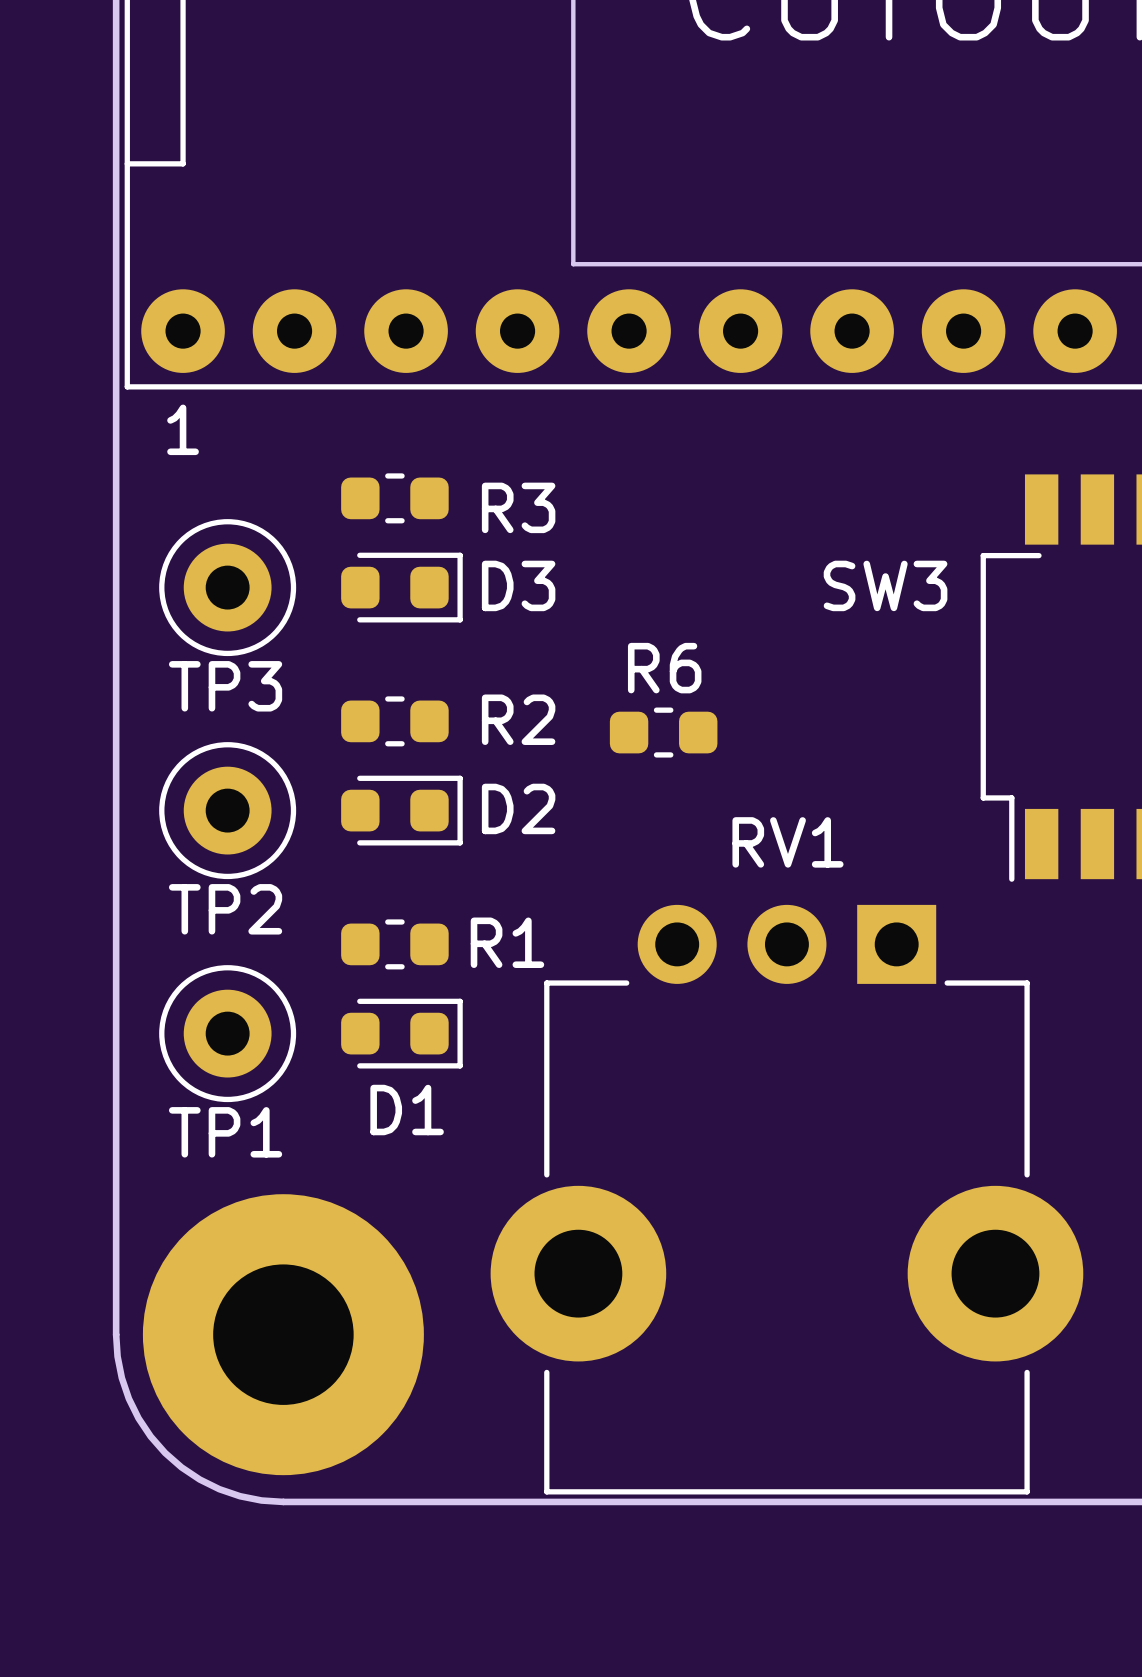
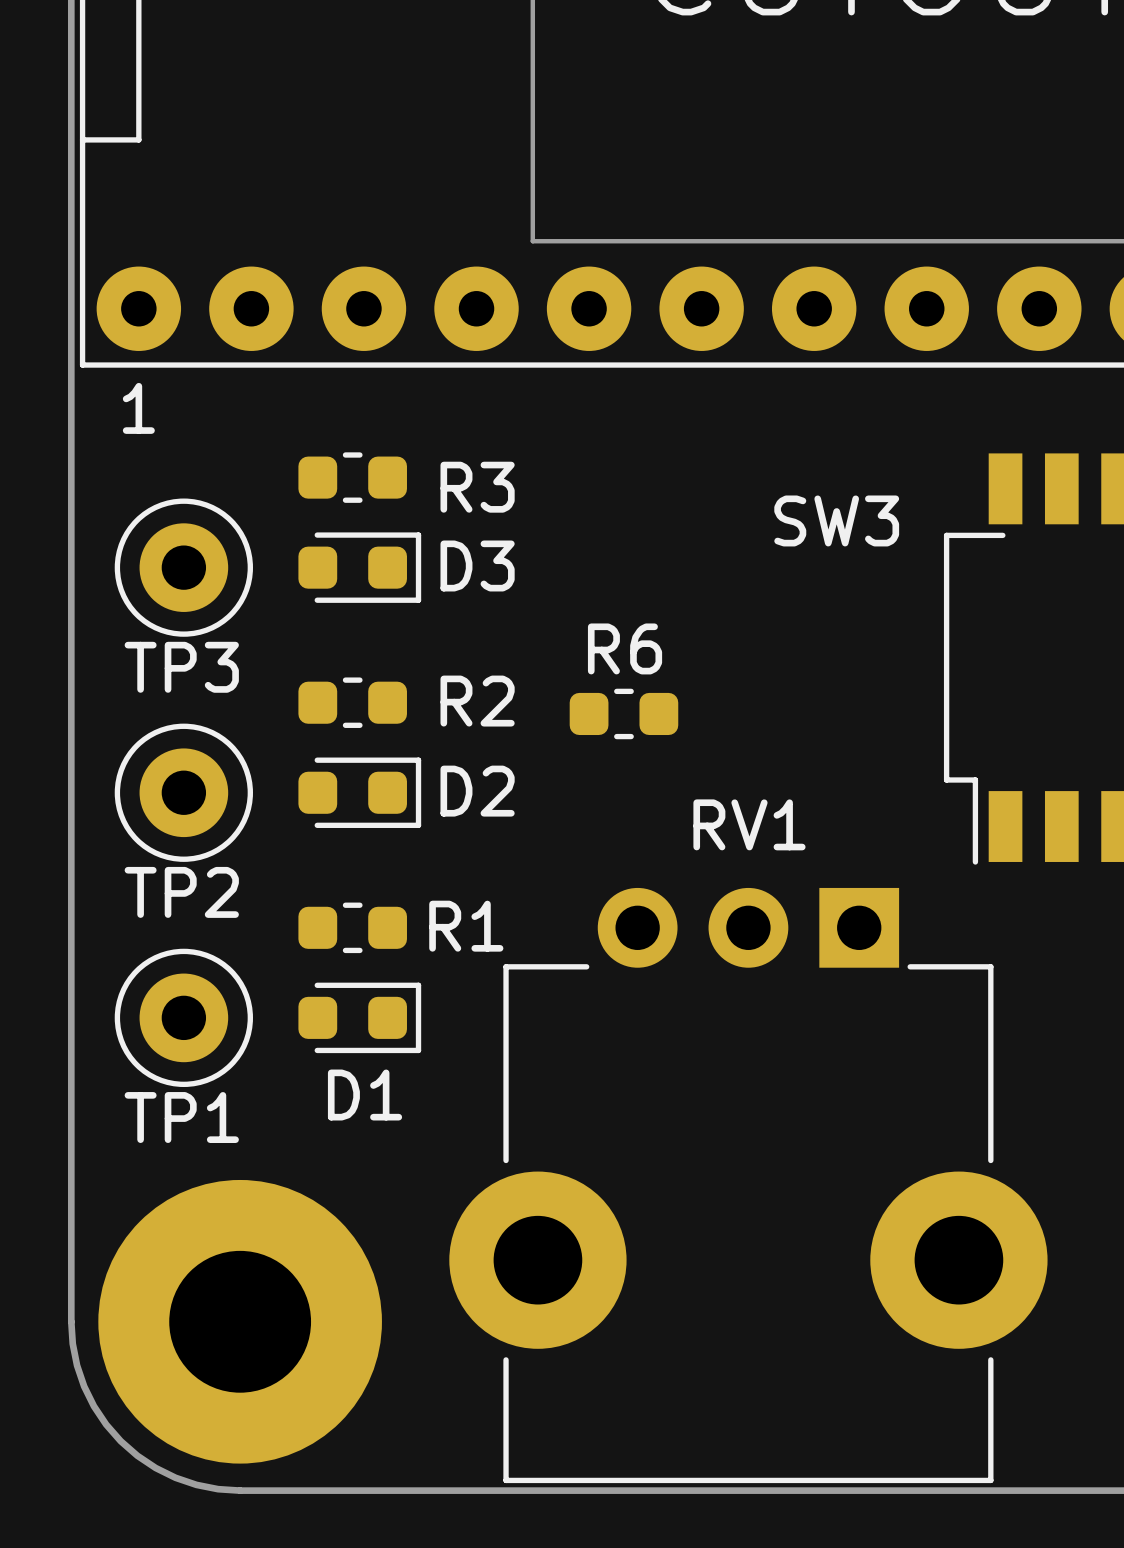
SW3 name position: SW3 (885, 585) -> SW3 (836, 520)

